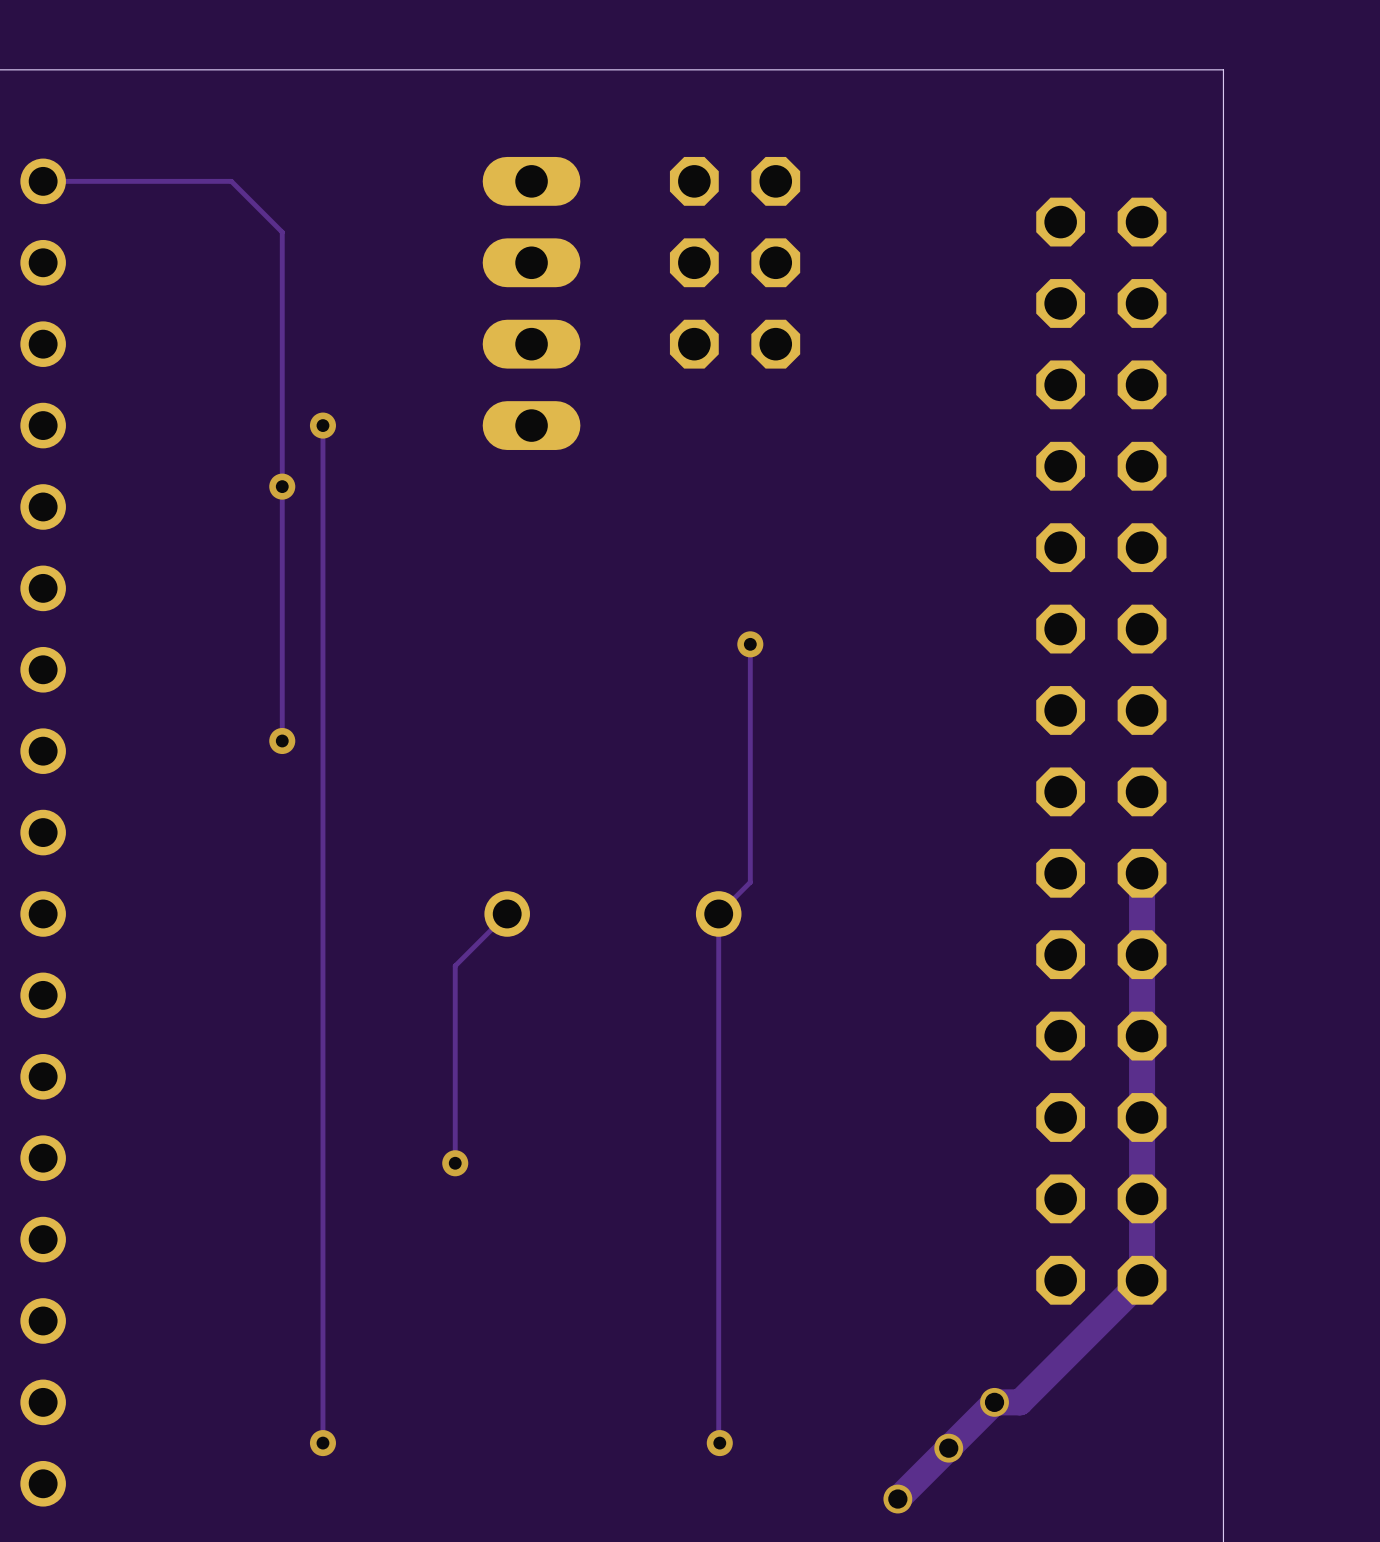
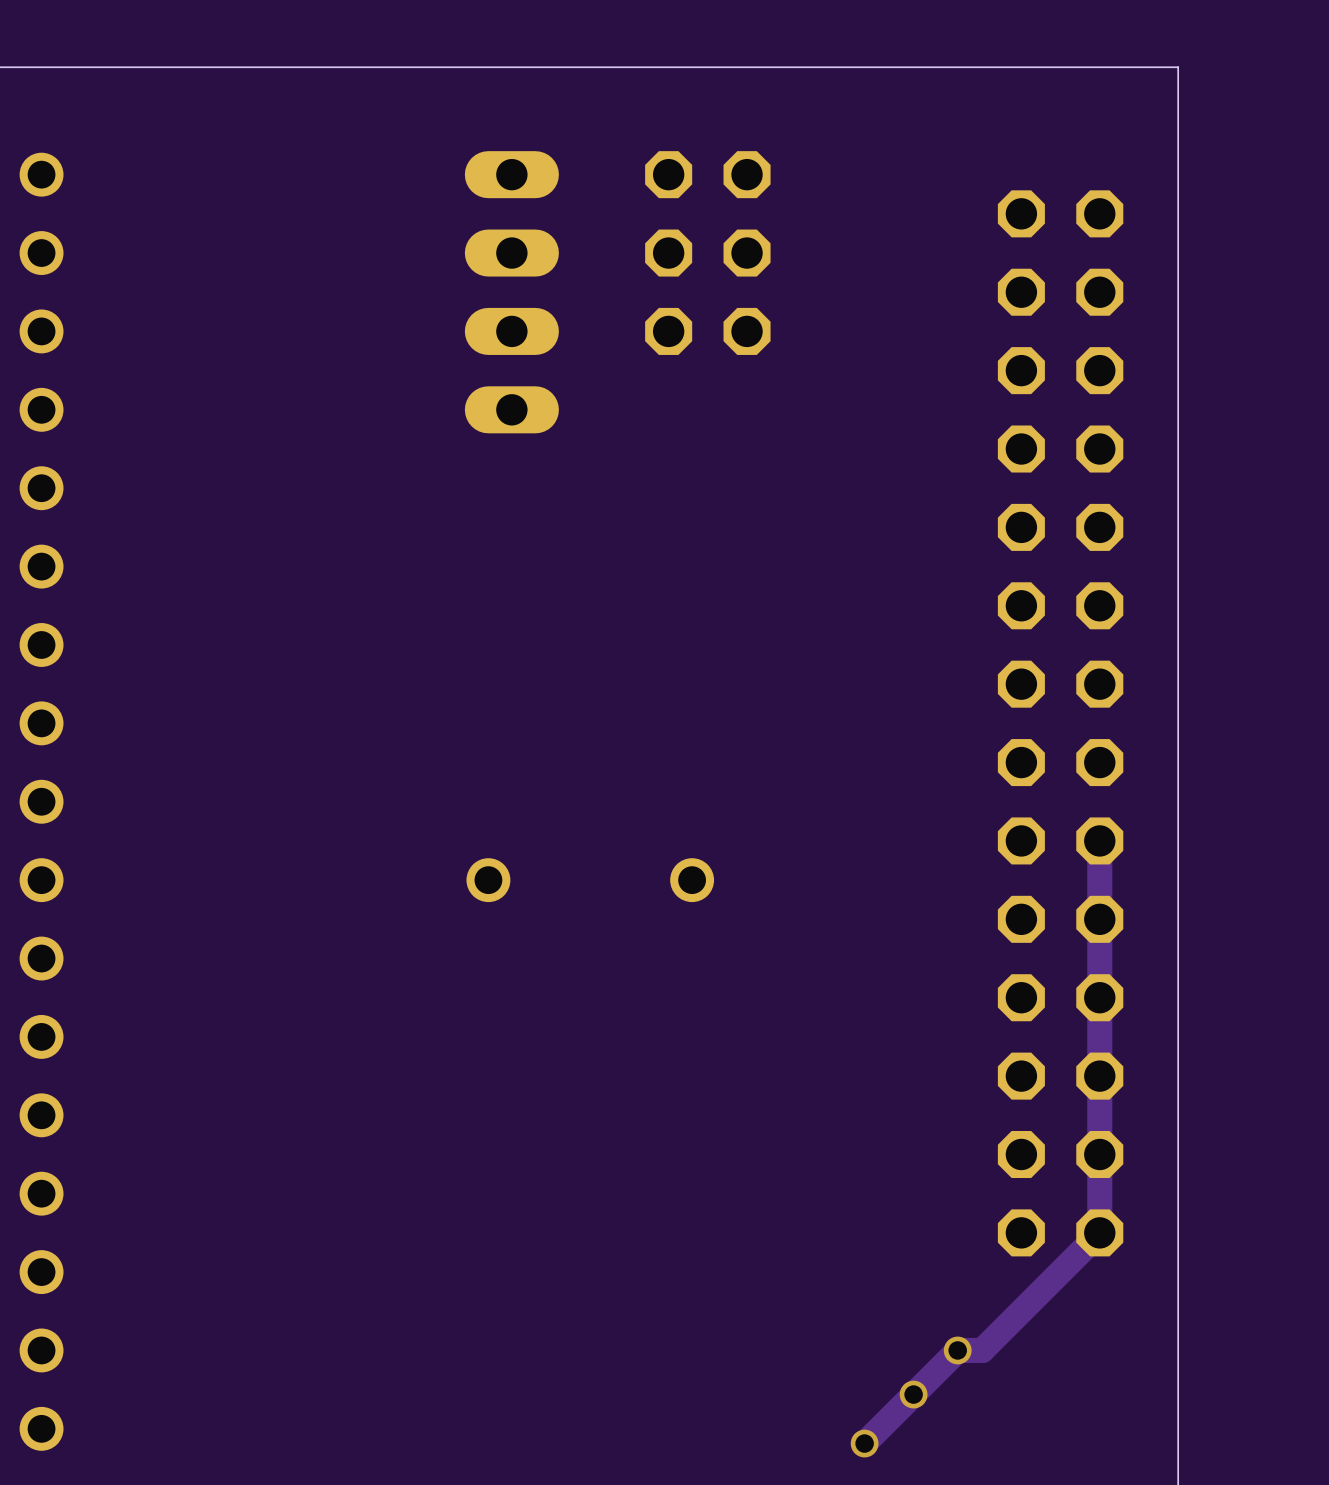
track: (43, 181) (231, 181) (282, 232) (282, 740) -> none
track: (322, 425) (322, 1443) -> none
via: (322, 425) -> none
via: (282, 486) -> none
track: (750, 644) (750, 882) (718, 913) (719, 1443) -> none
via: (750, 644) -> none
via: (282, 740) -> none
track: (507, 913) (455, 965) (455, 1163) -> none
via: (455, 1163) -> none
via: (322, 1443) -> none
via: (719, 1443) -> none

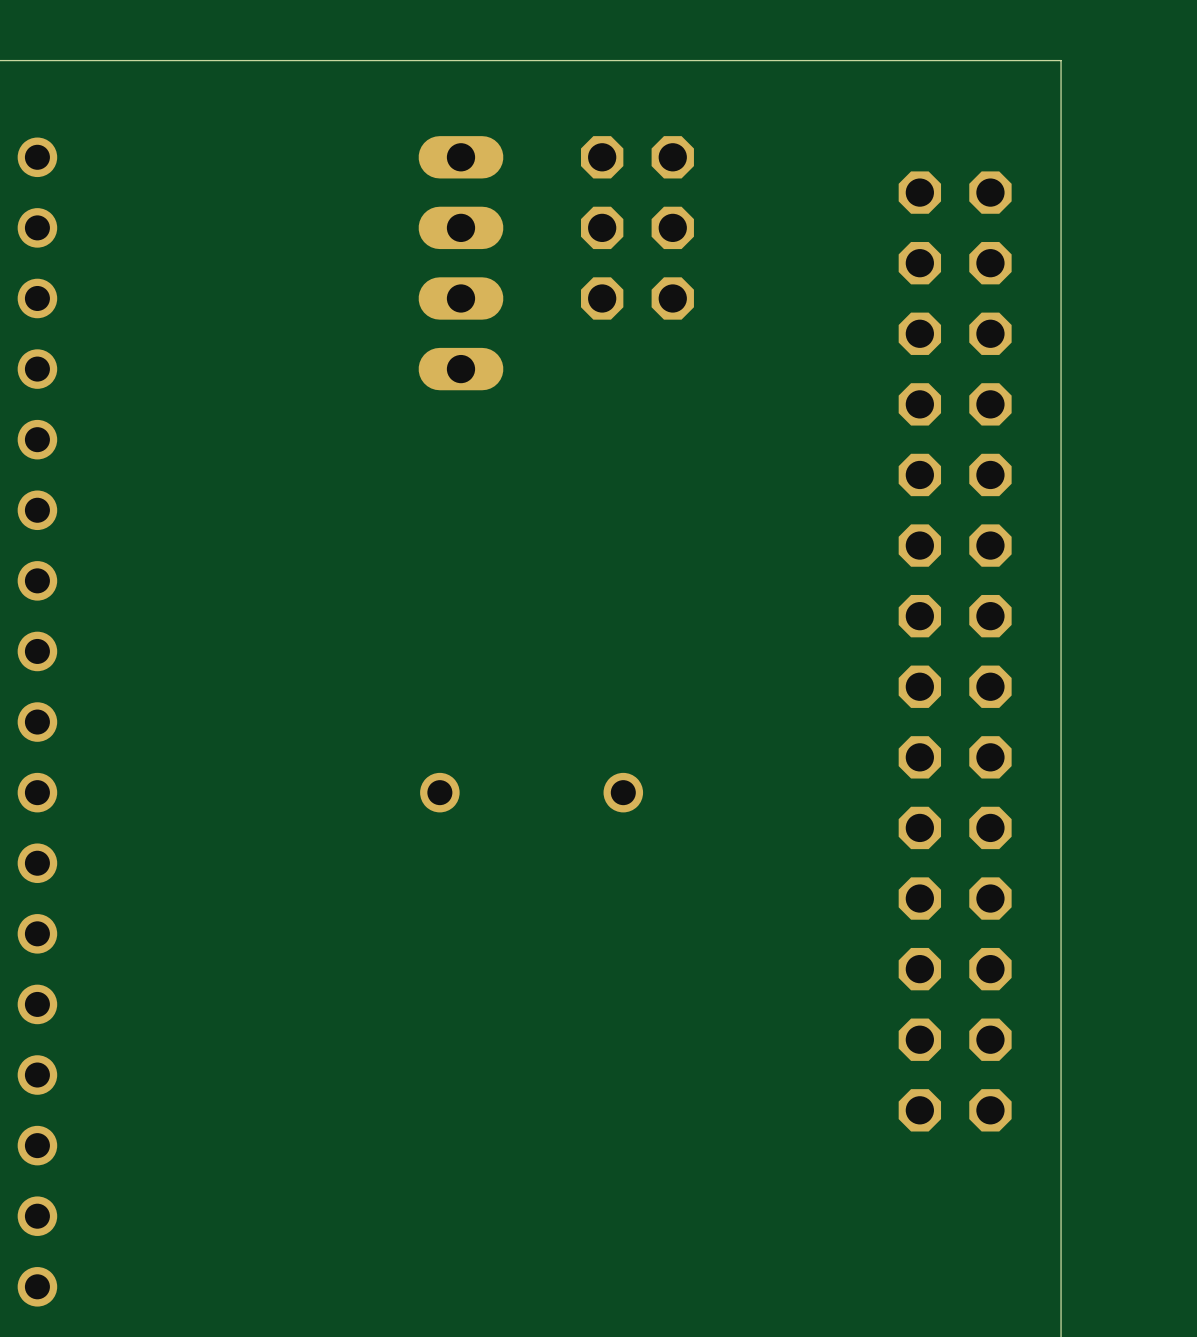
track: (1099, 831) (1099, 1232) (982, 1350) (957, 1350) (864, 1443) -> none
via: (957, 1350) -> none
via: (913, 1394) -> none
via: (864, 1443) -> none

